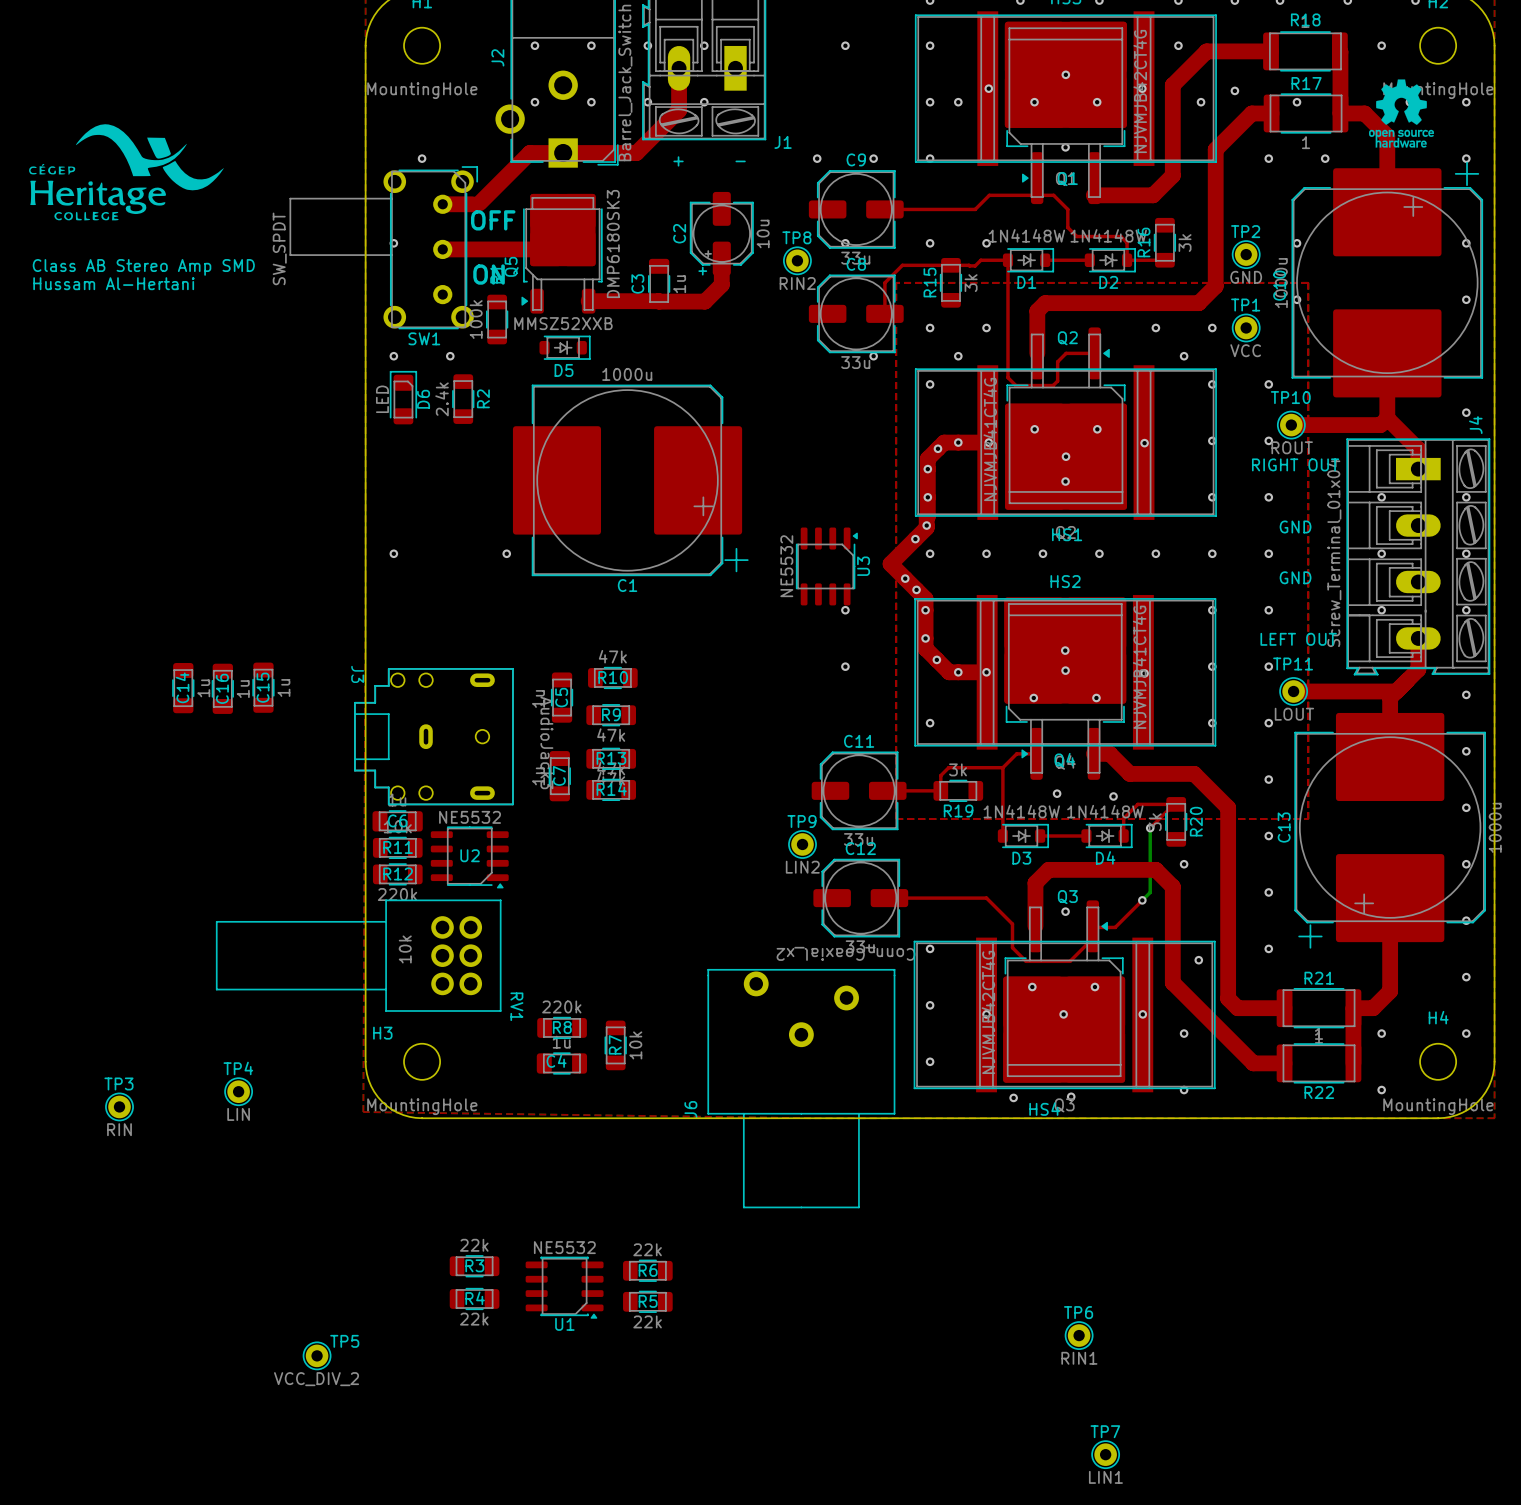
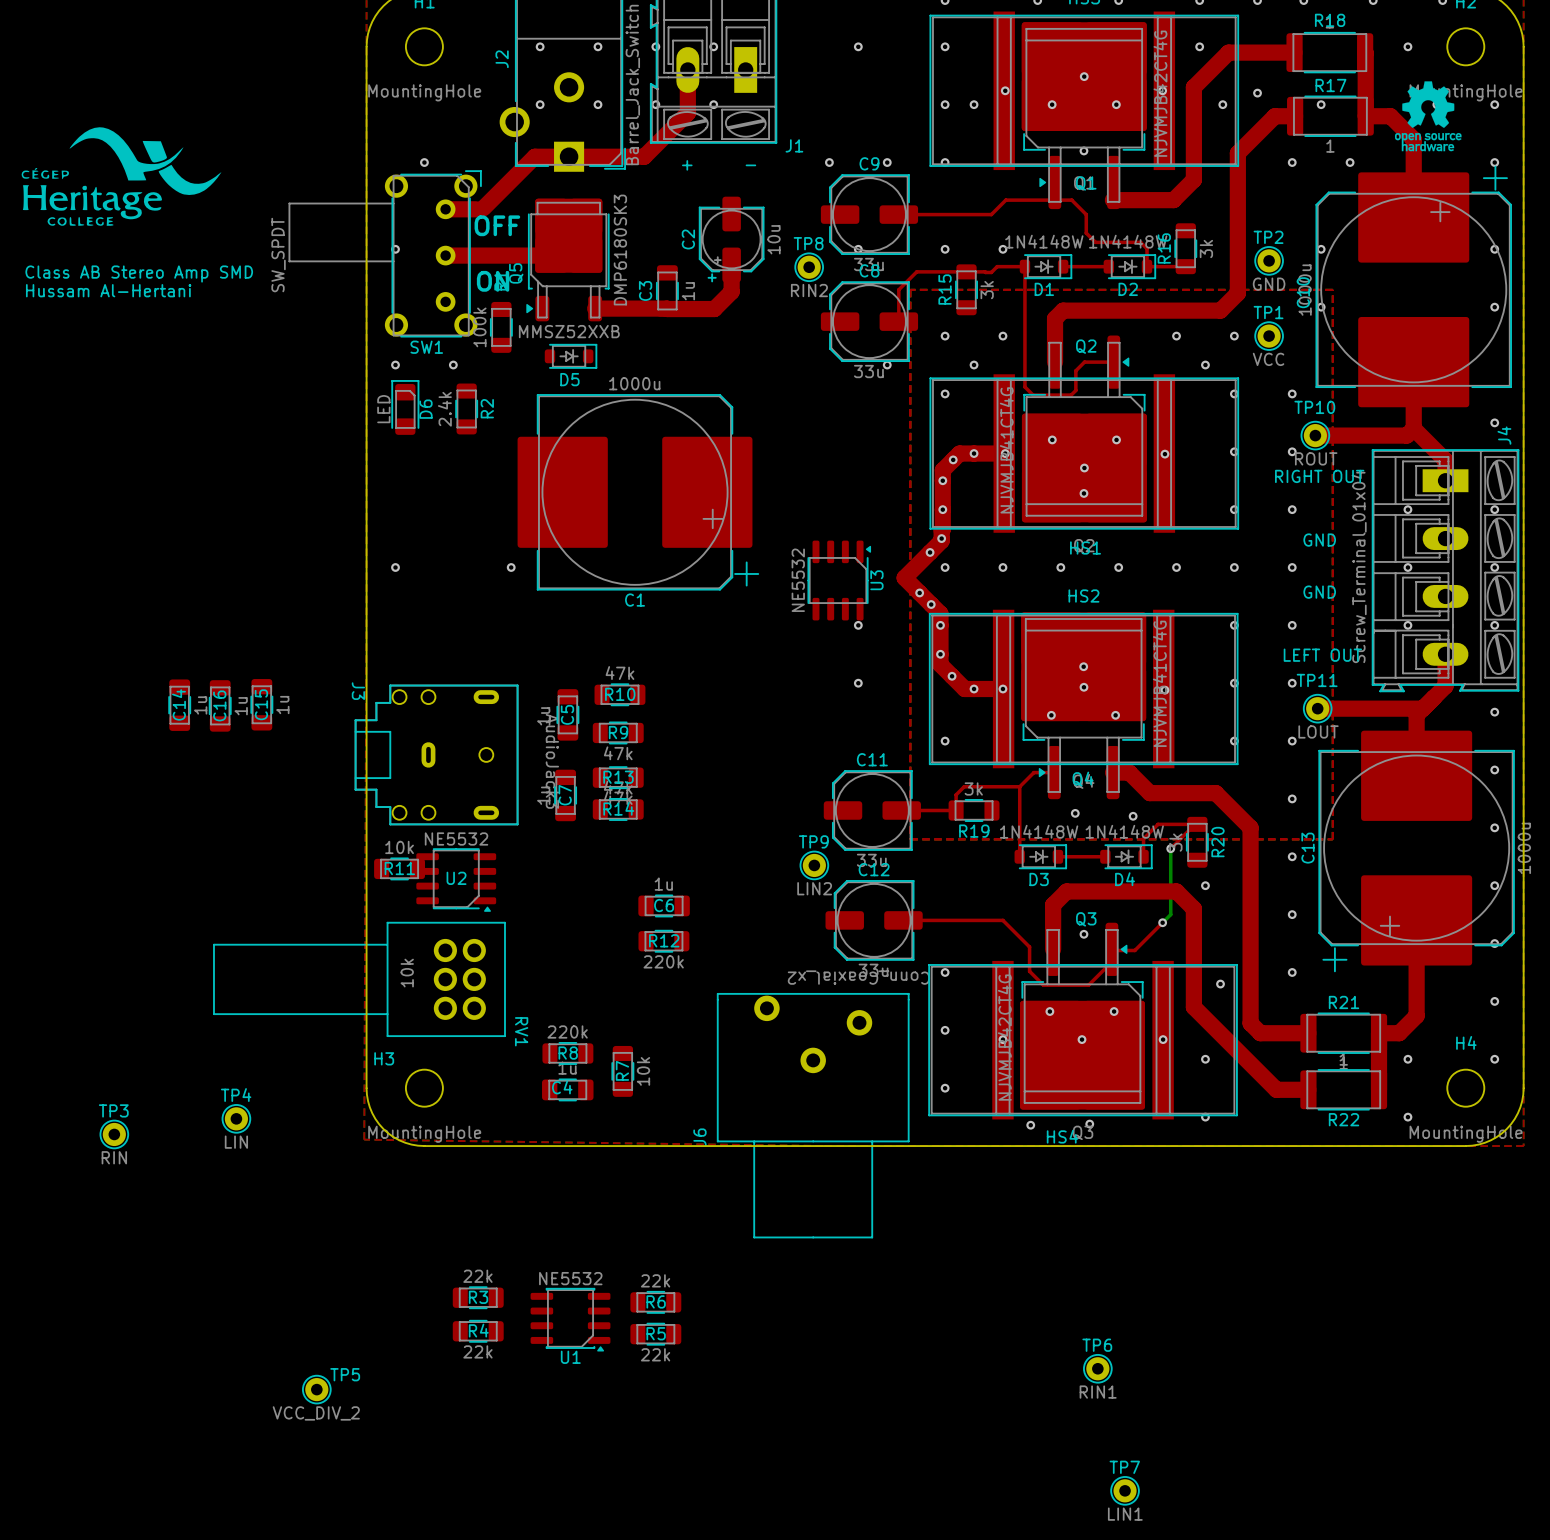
C6 position: (397, 821) -> (664, 905)
U2 position: (469, 857) -> (456, 880)
R12 position: (397, 874) -> (663, 941)

